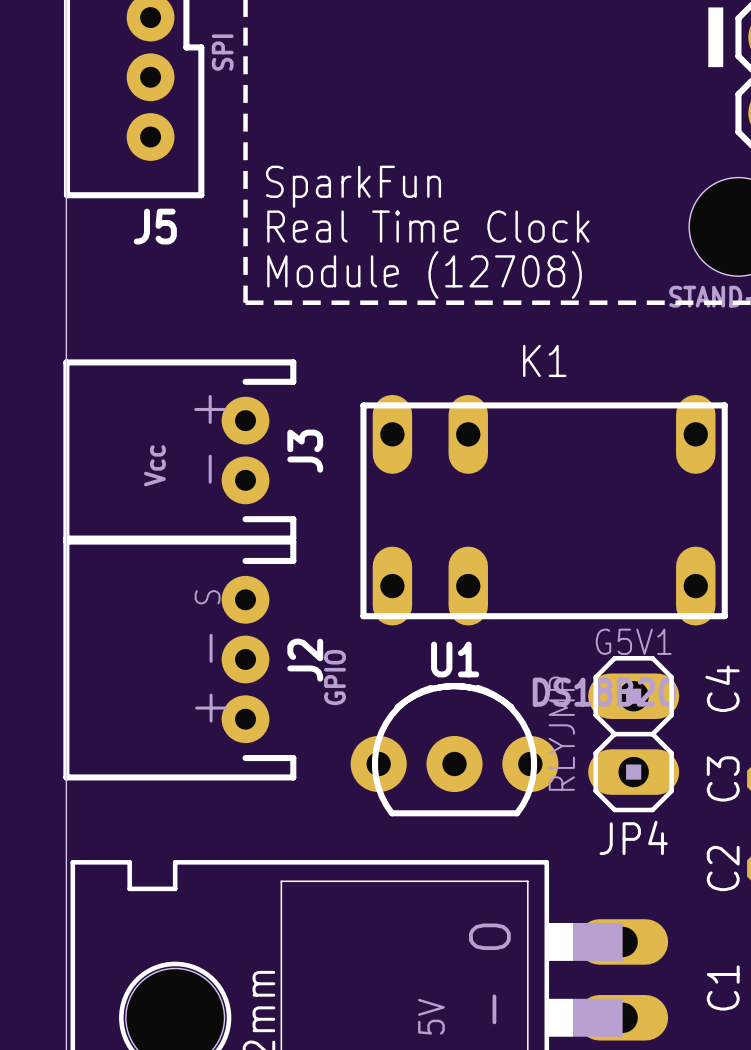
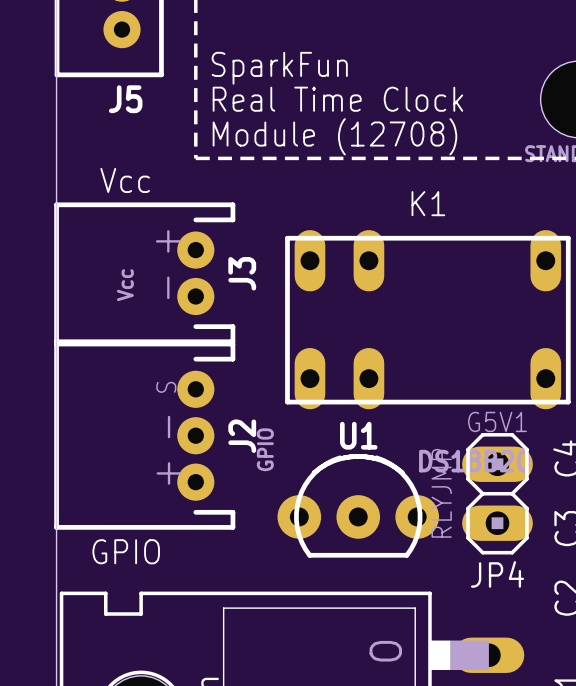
text: none -> Vcc (125, 180)
text: none -> GPIO (126, 551)

